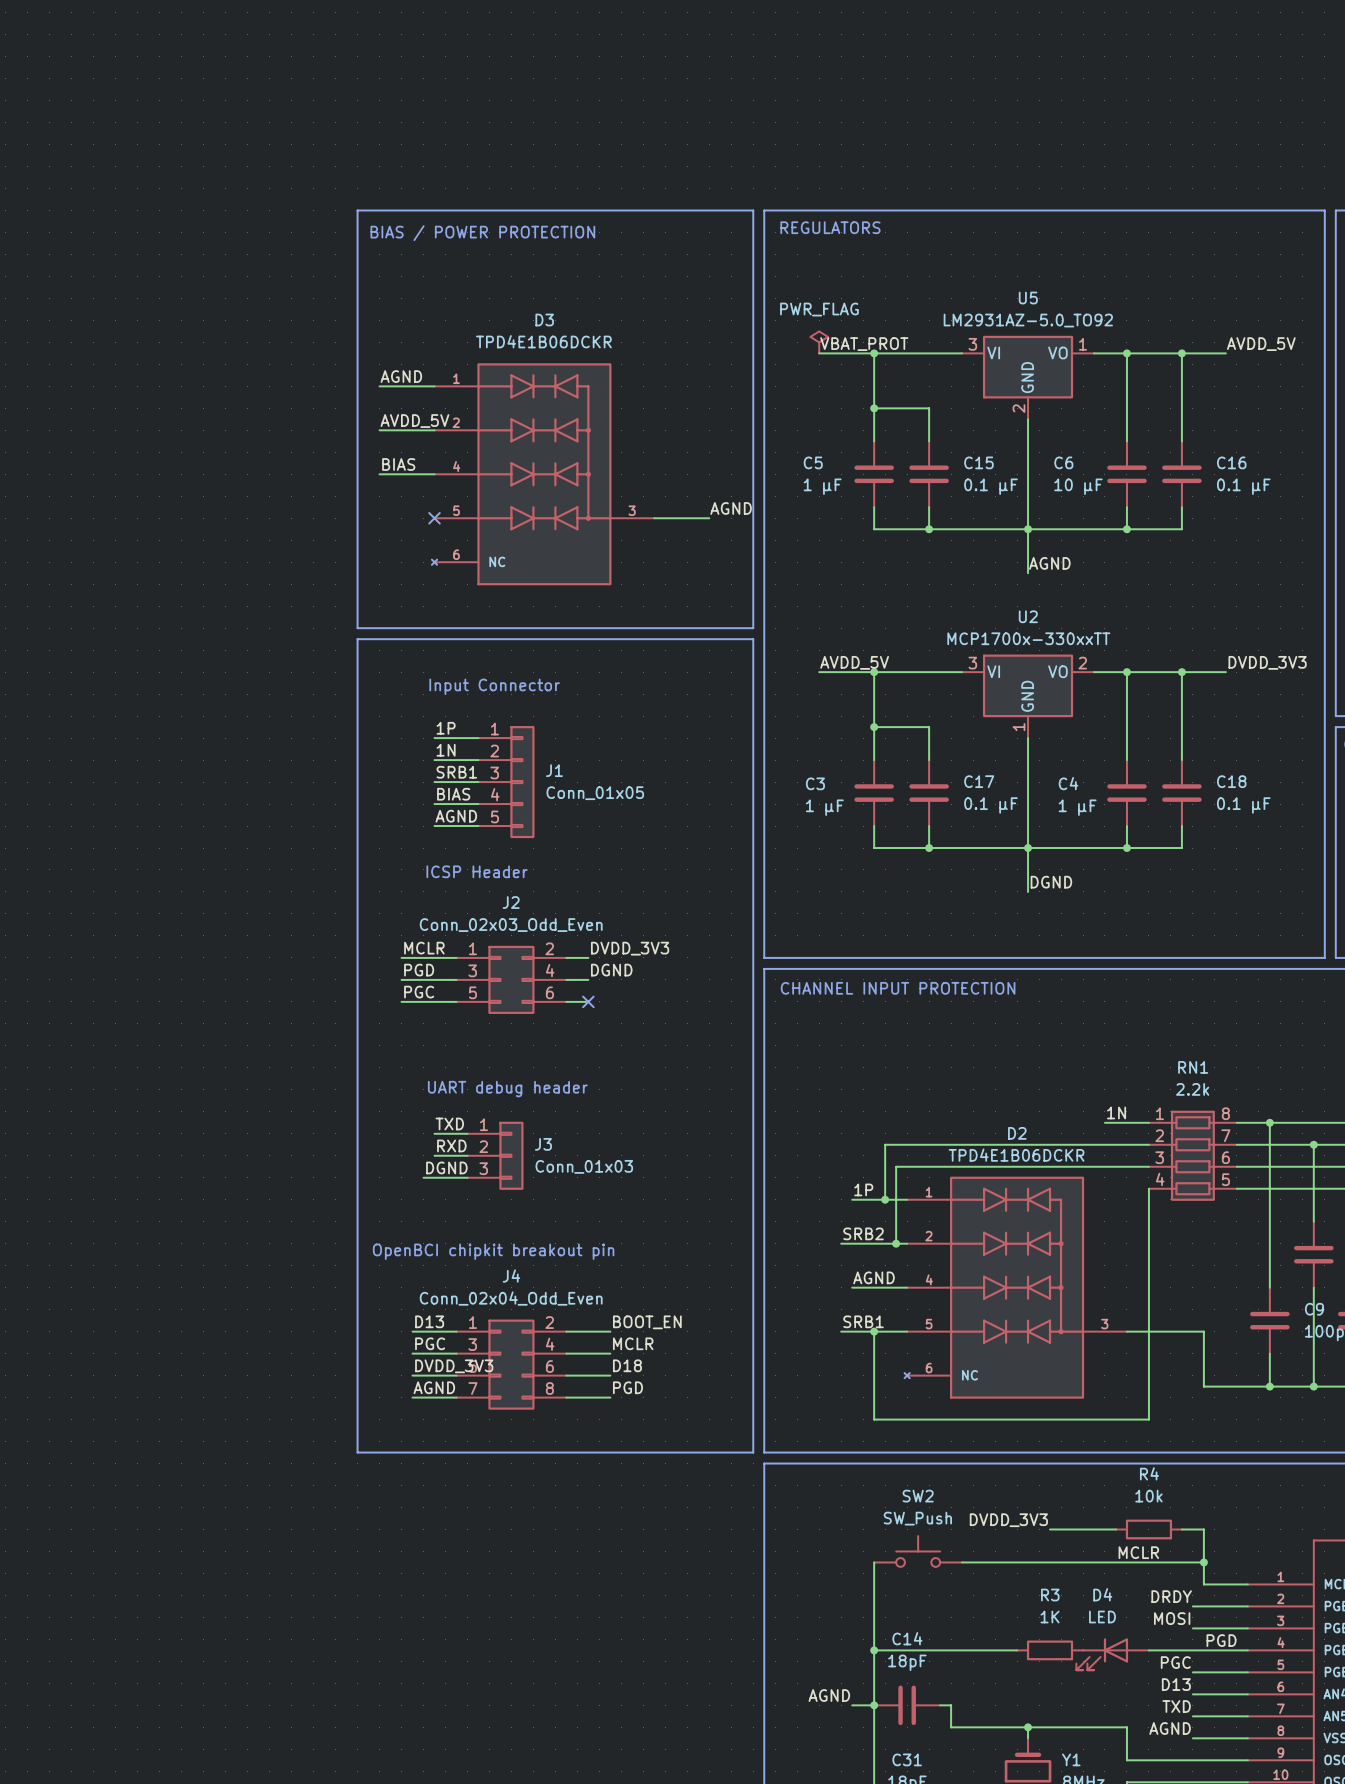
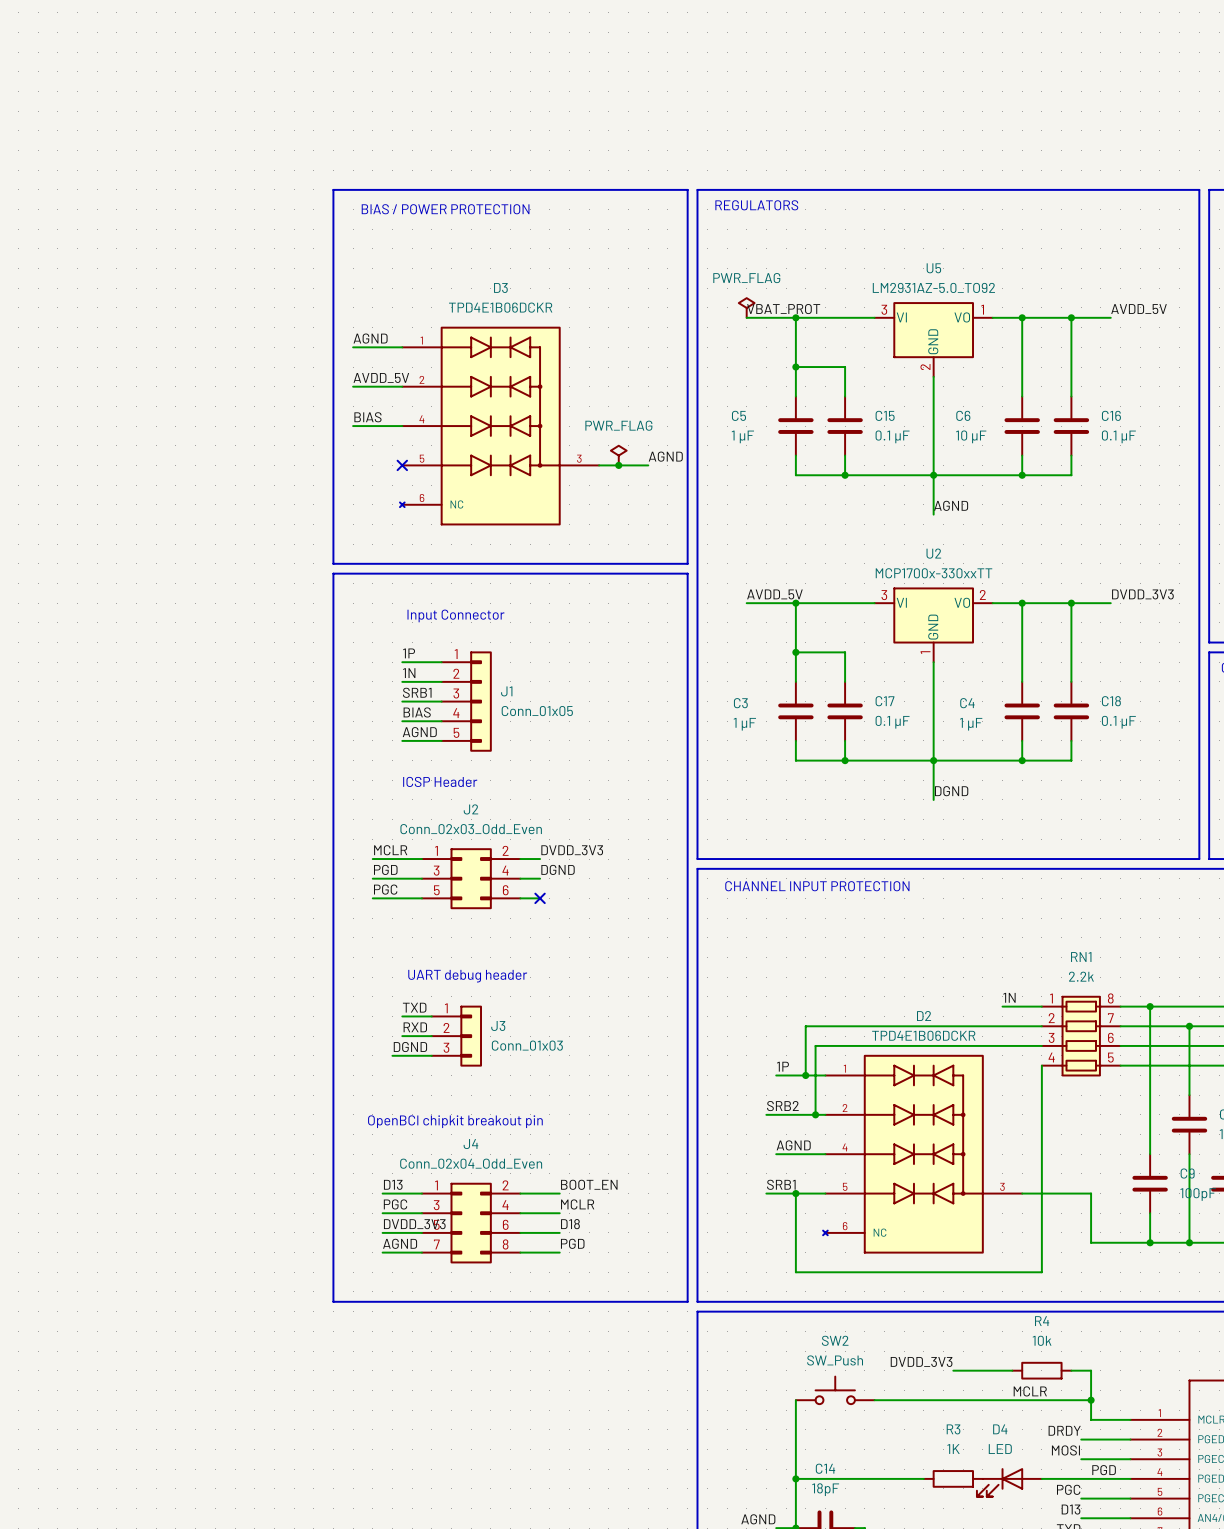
power symbol: none -> PWR_FLAG (618, 455)
junction: none -> (618, 465)

